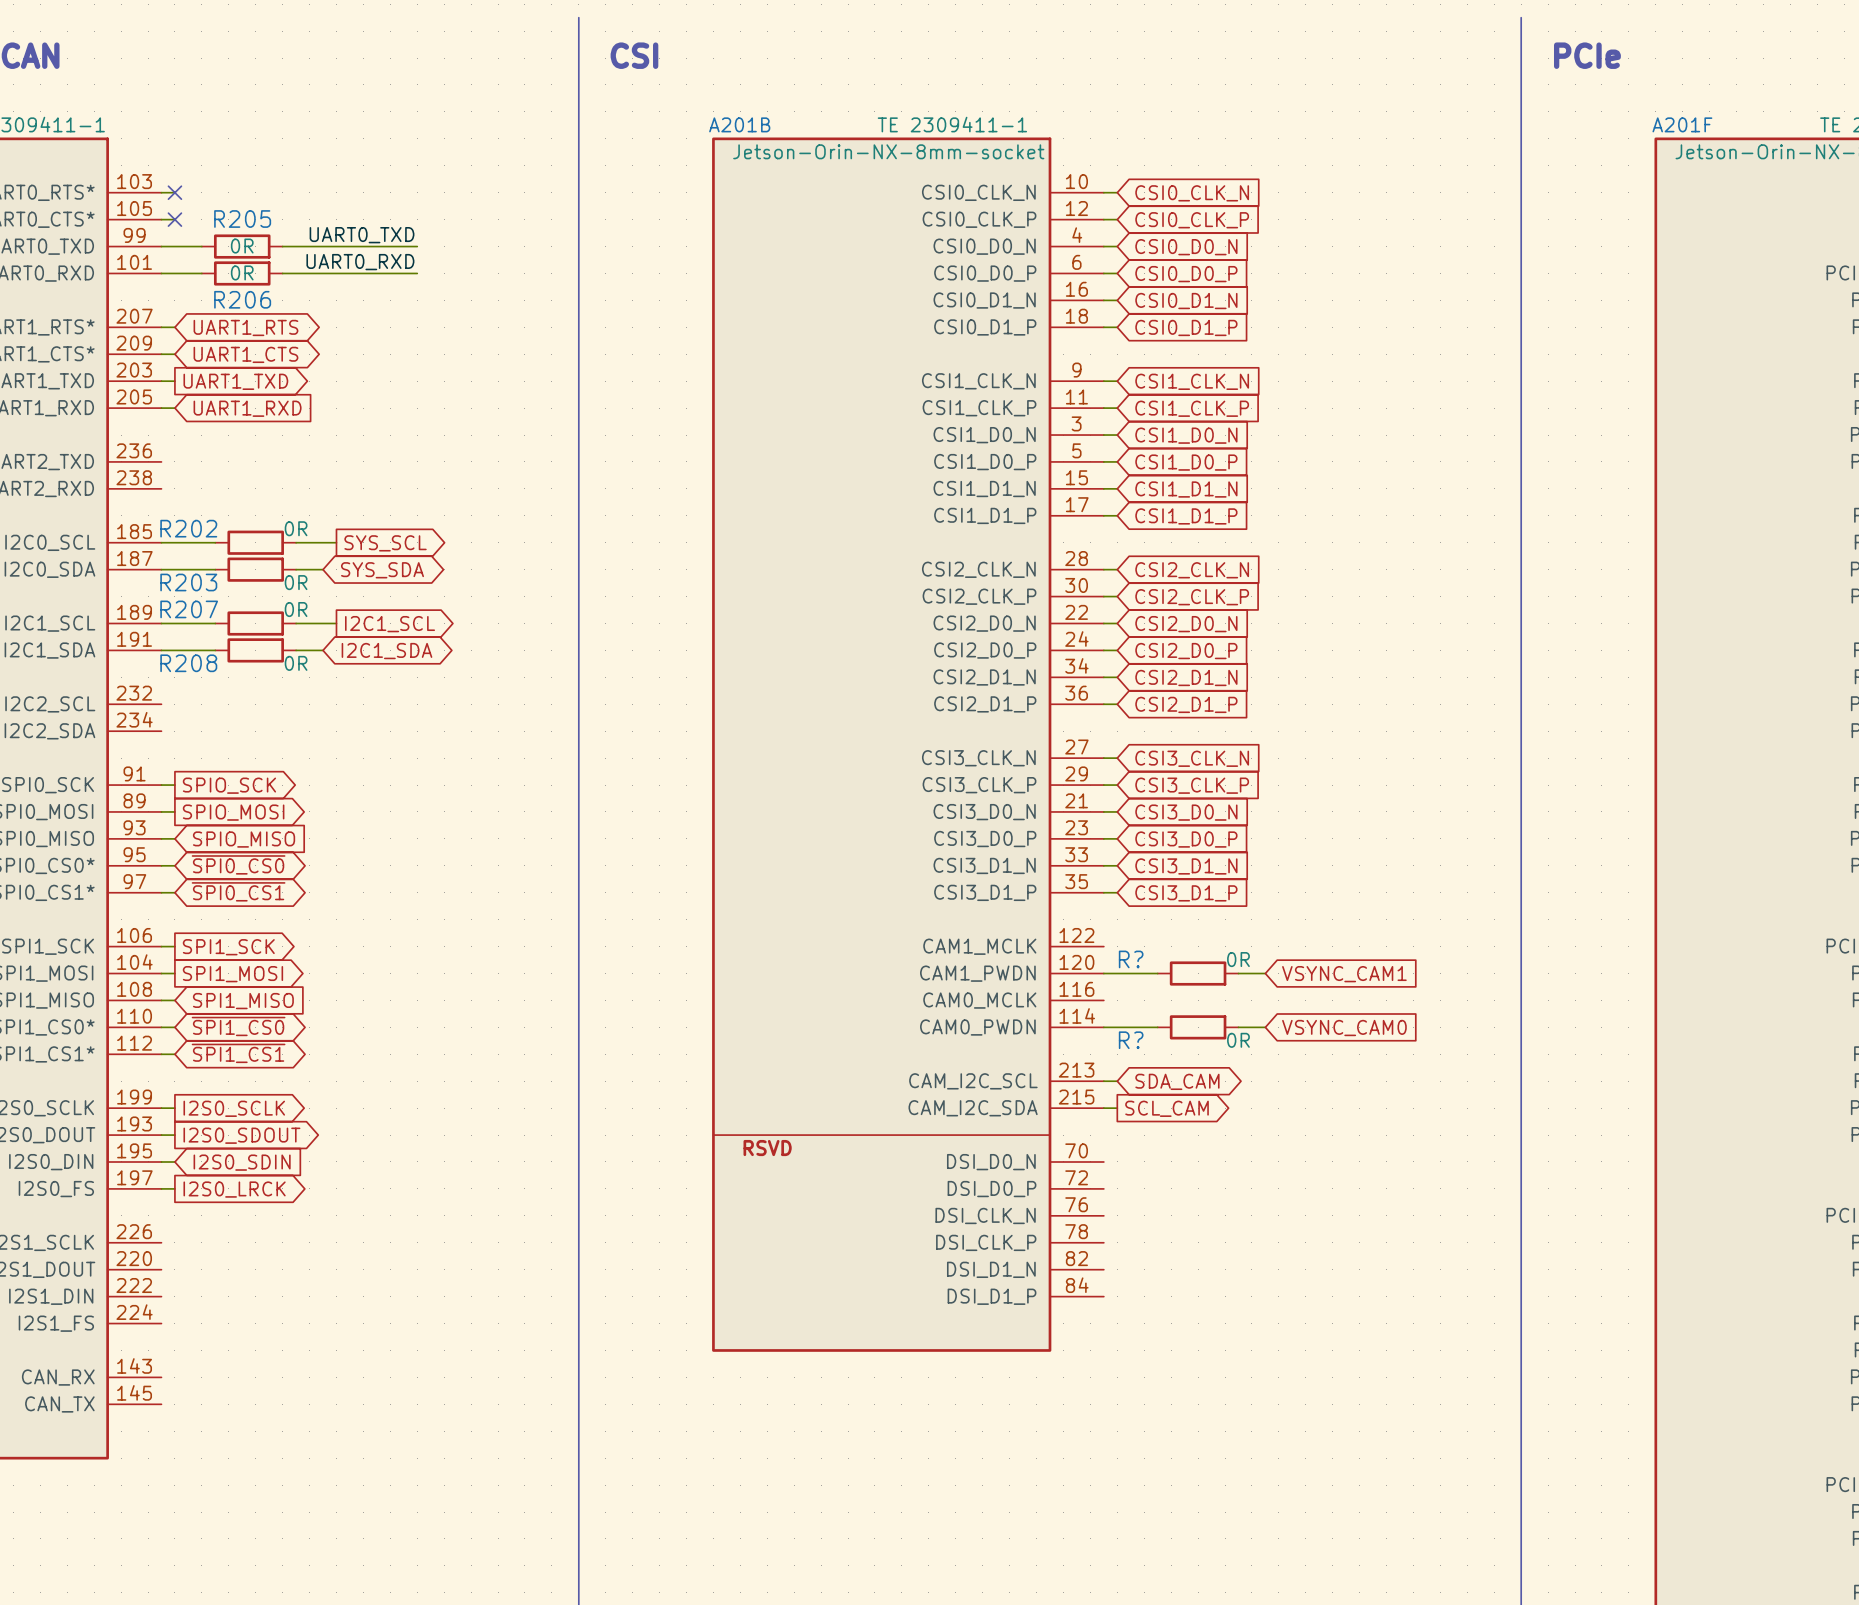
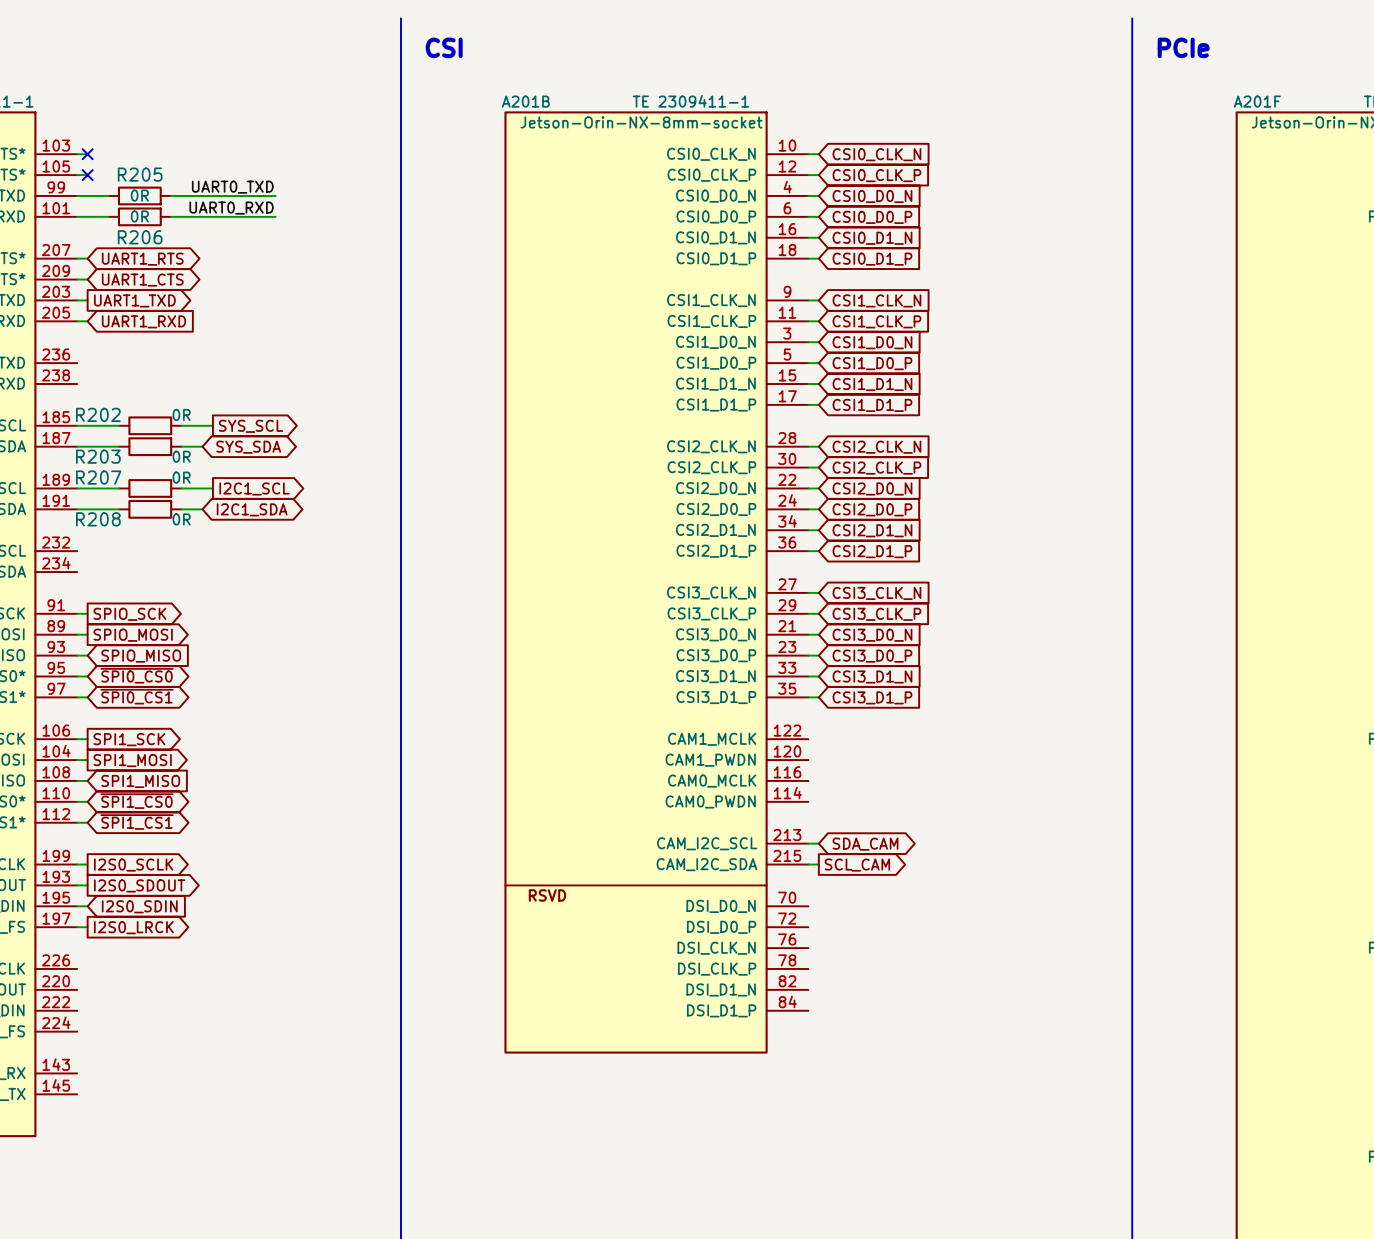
wire: (1103, 973) (1157, 973) -> none
R?: (1198, 973) -> none
wire: (1238, 973) (1265, 973) -> none
global label: VSYNC_CAM1 (1344, 974) -> none
wire: (1103, 1027) (1157, 1027) -> none
R?: (1198, 1027) -> none
wire: (1238, 1027) (1265, 1027) -> none
global label: VSYNC_CAM0 (1344, 1028) -> none

